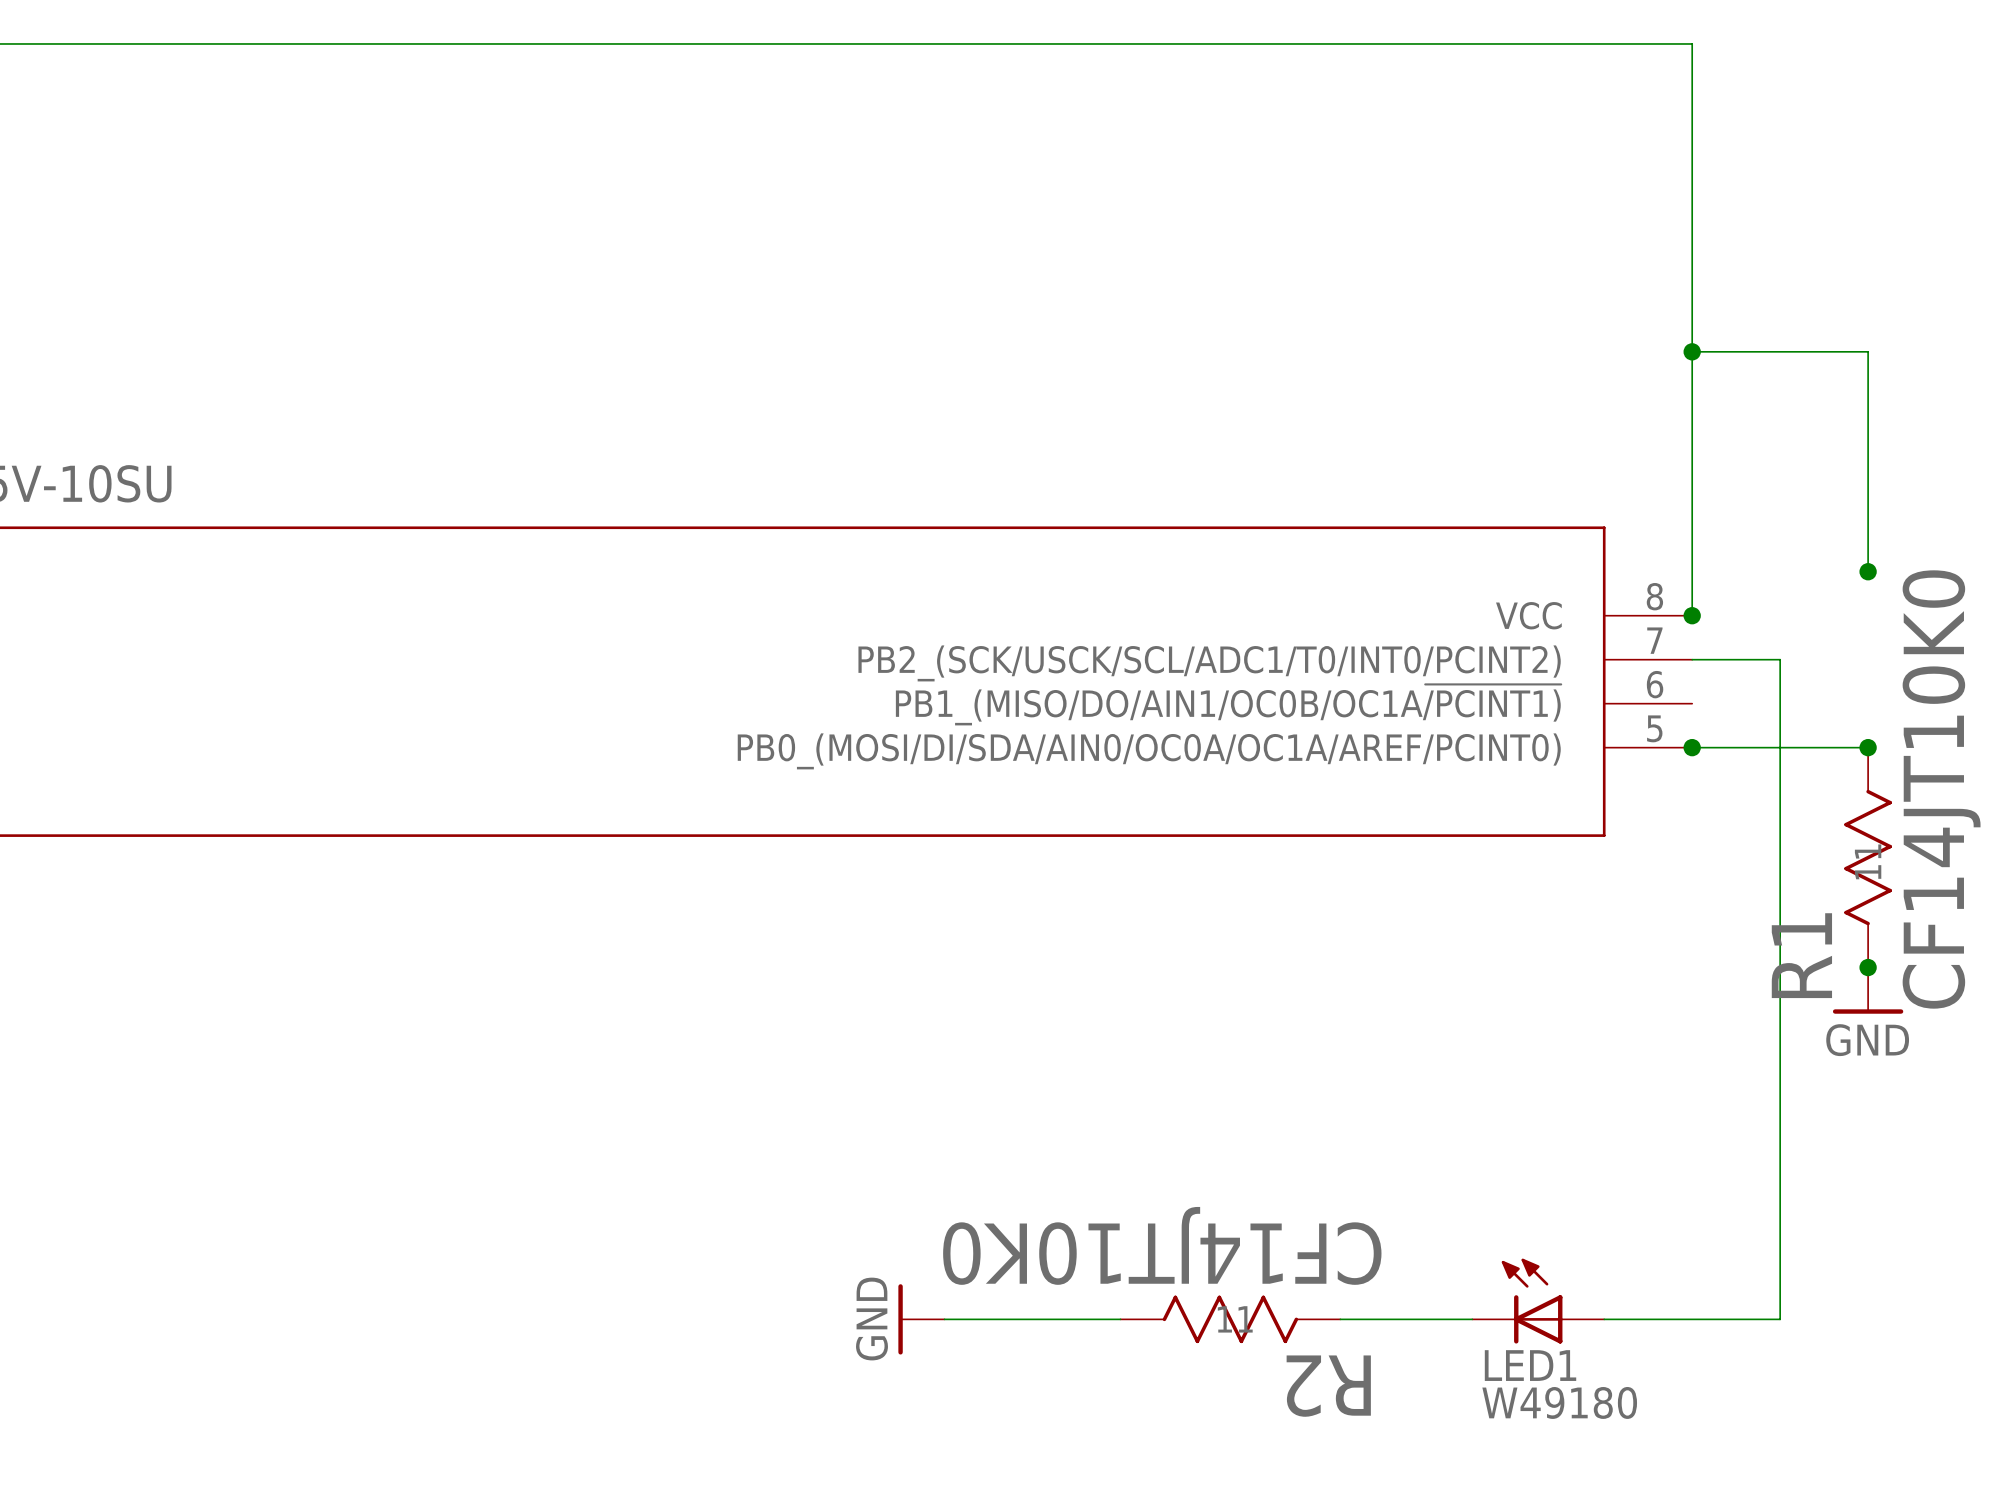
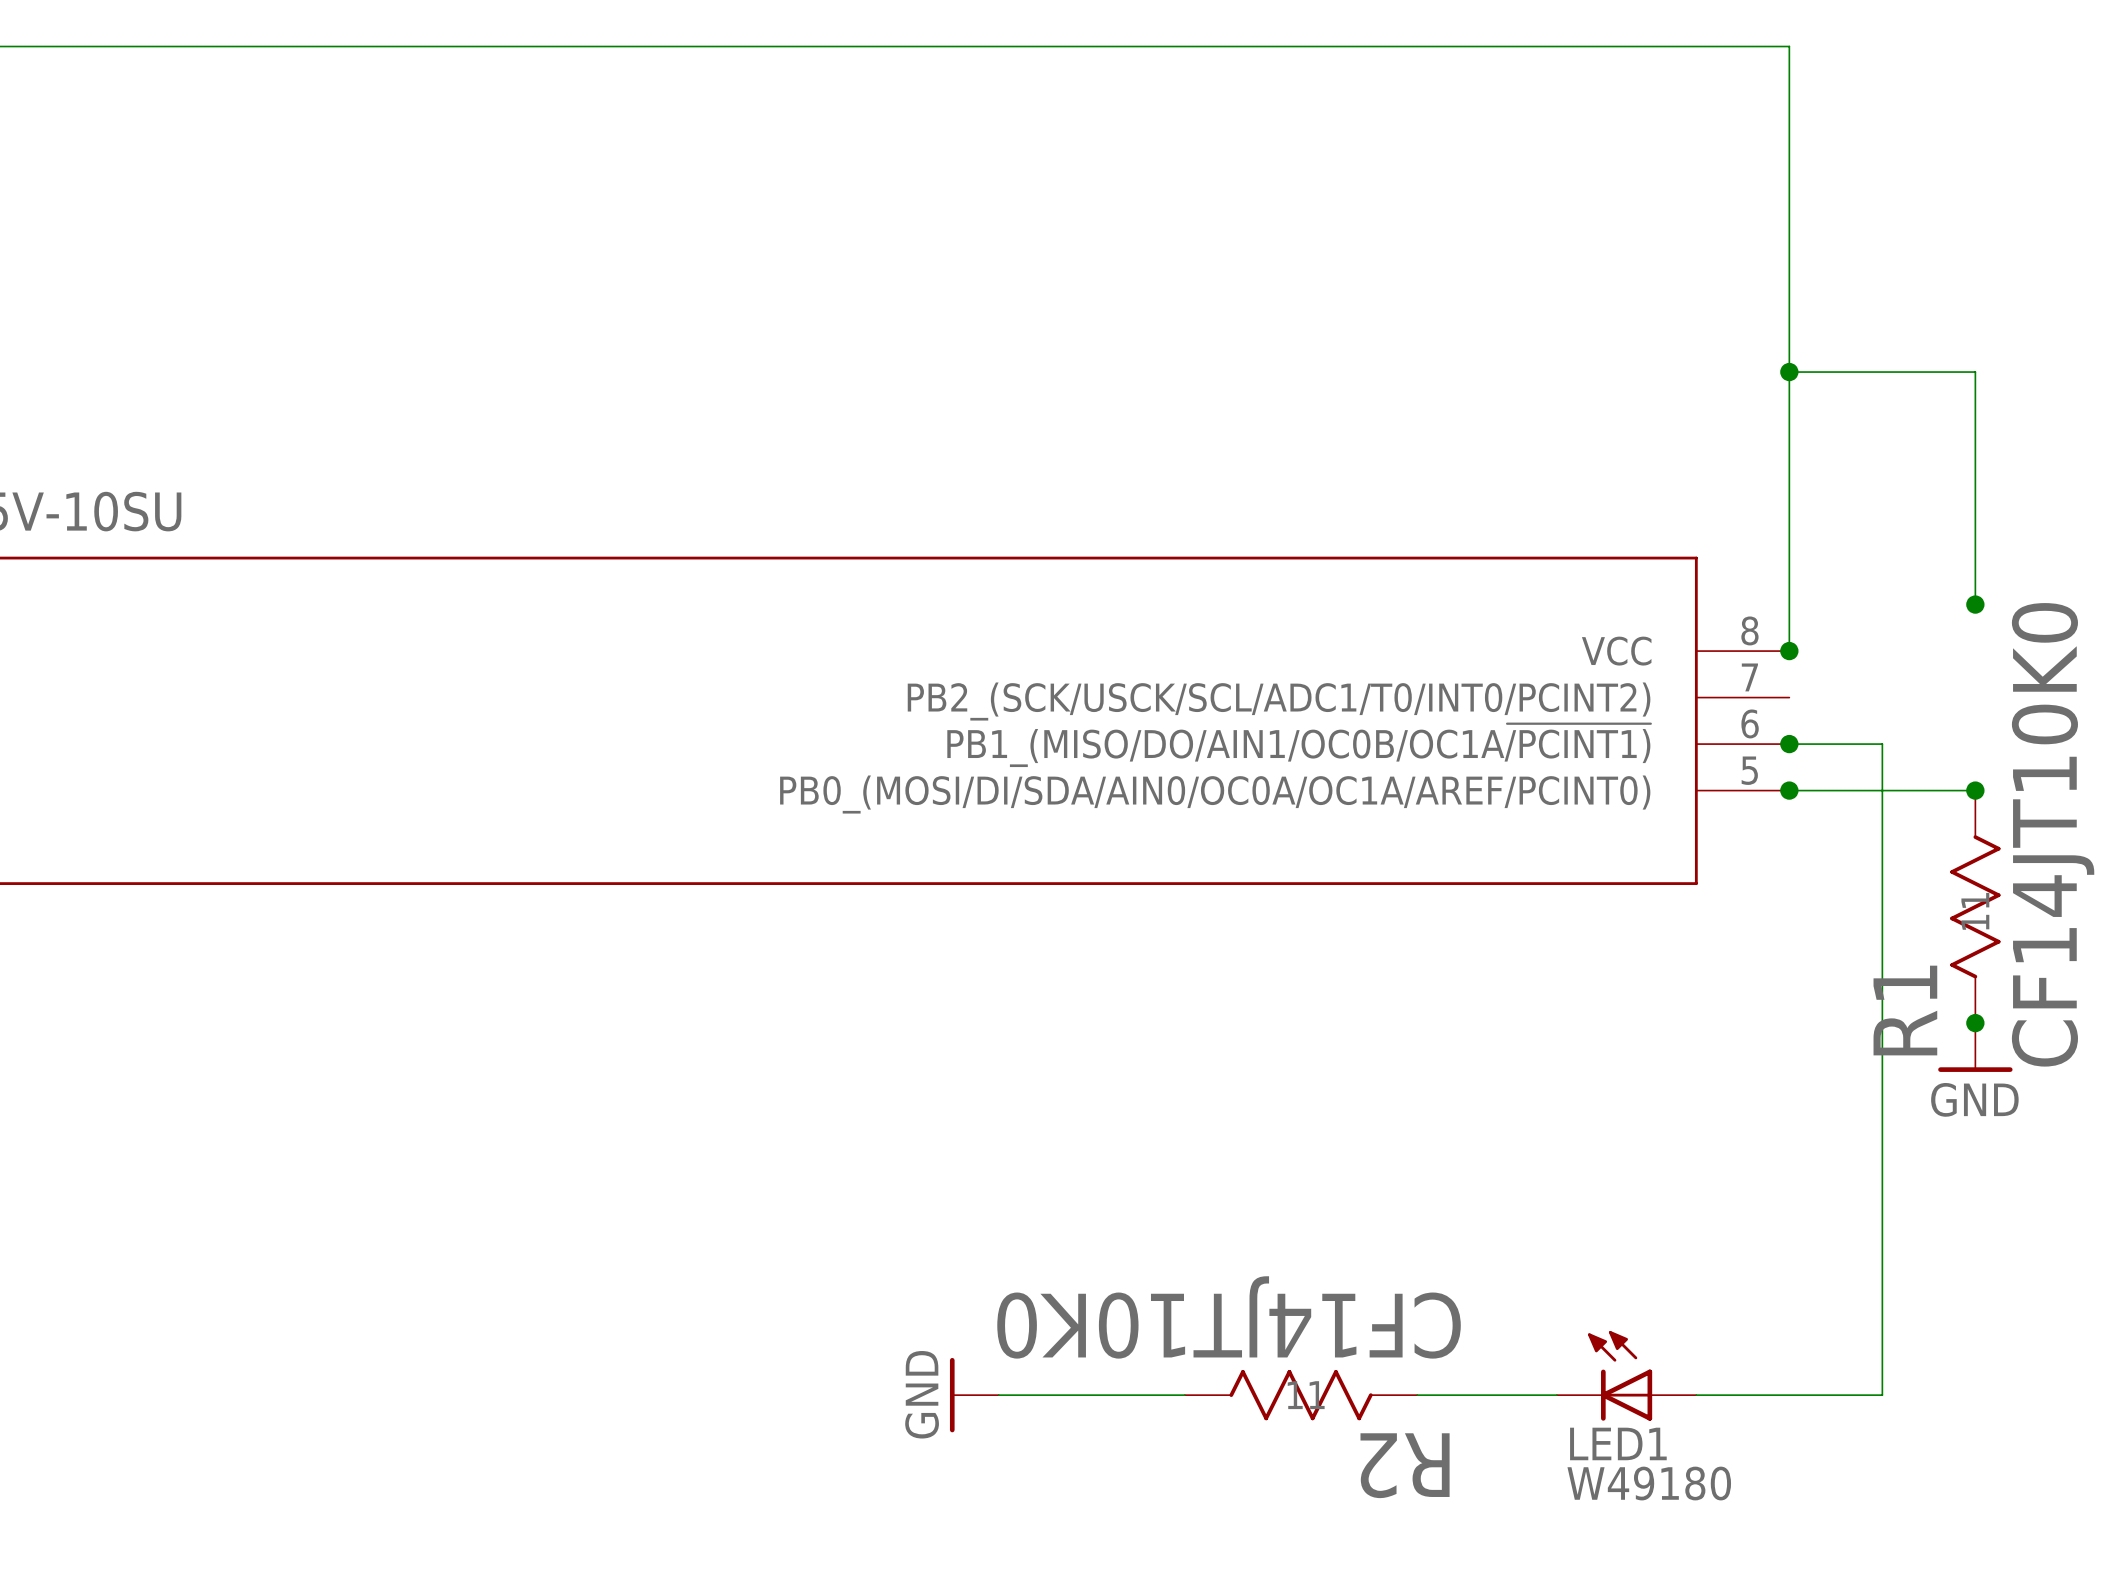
wire: (1692, 659) (1780, 659) (1780, 703) -> (1789, 744) (1882, 744)
junction: none -> (1789, 744)

